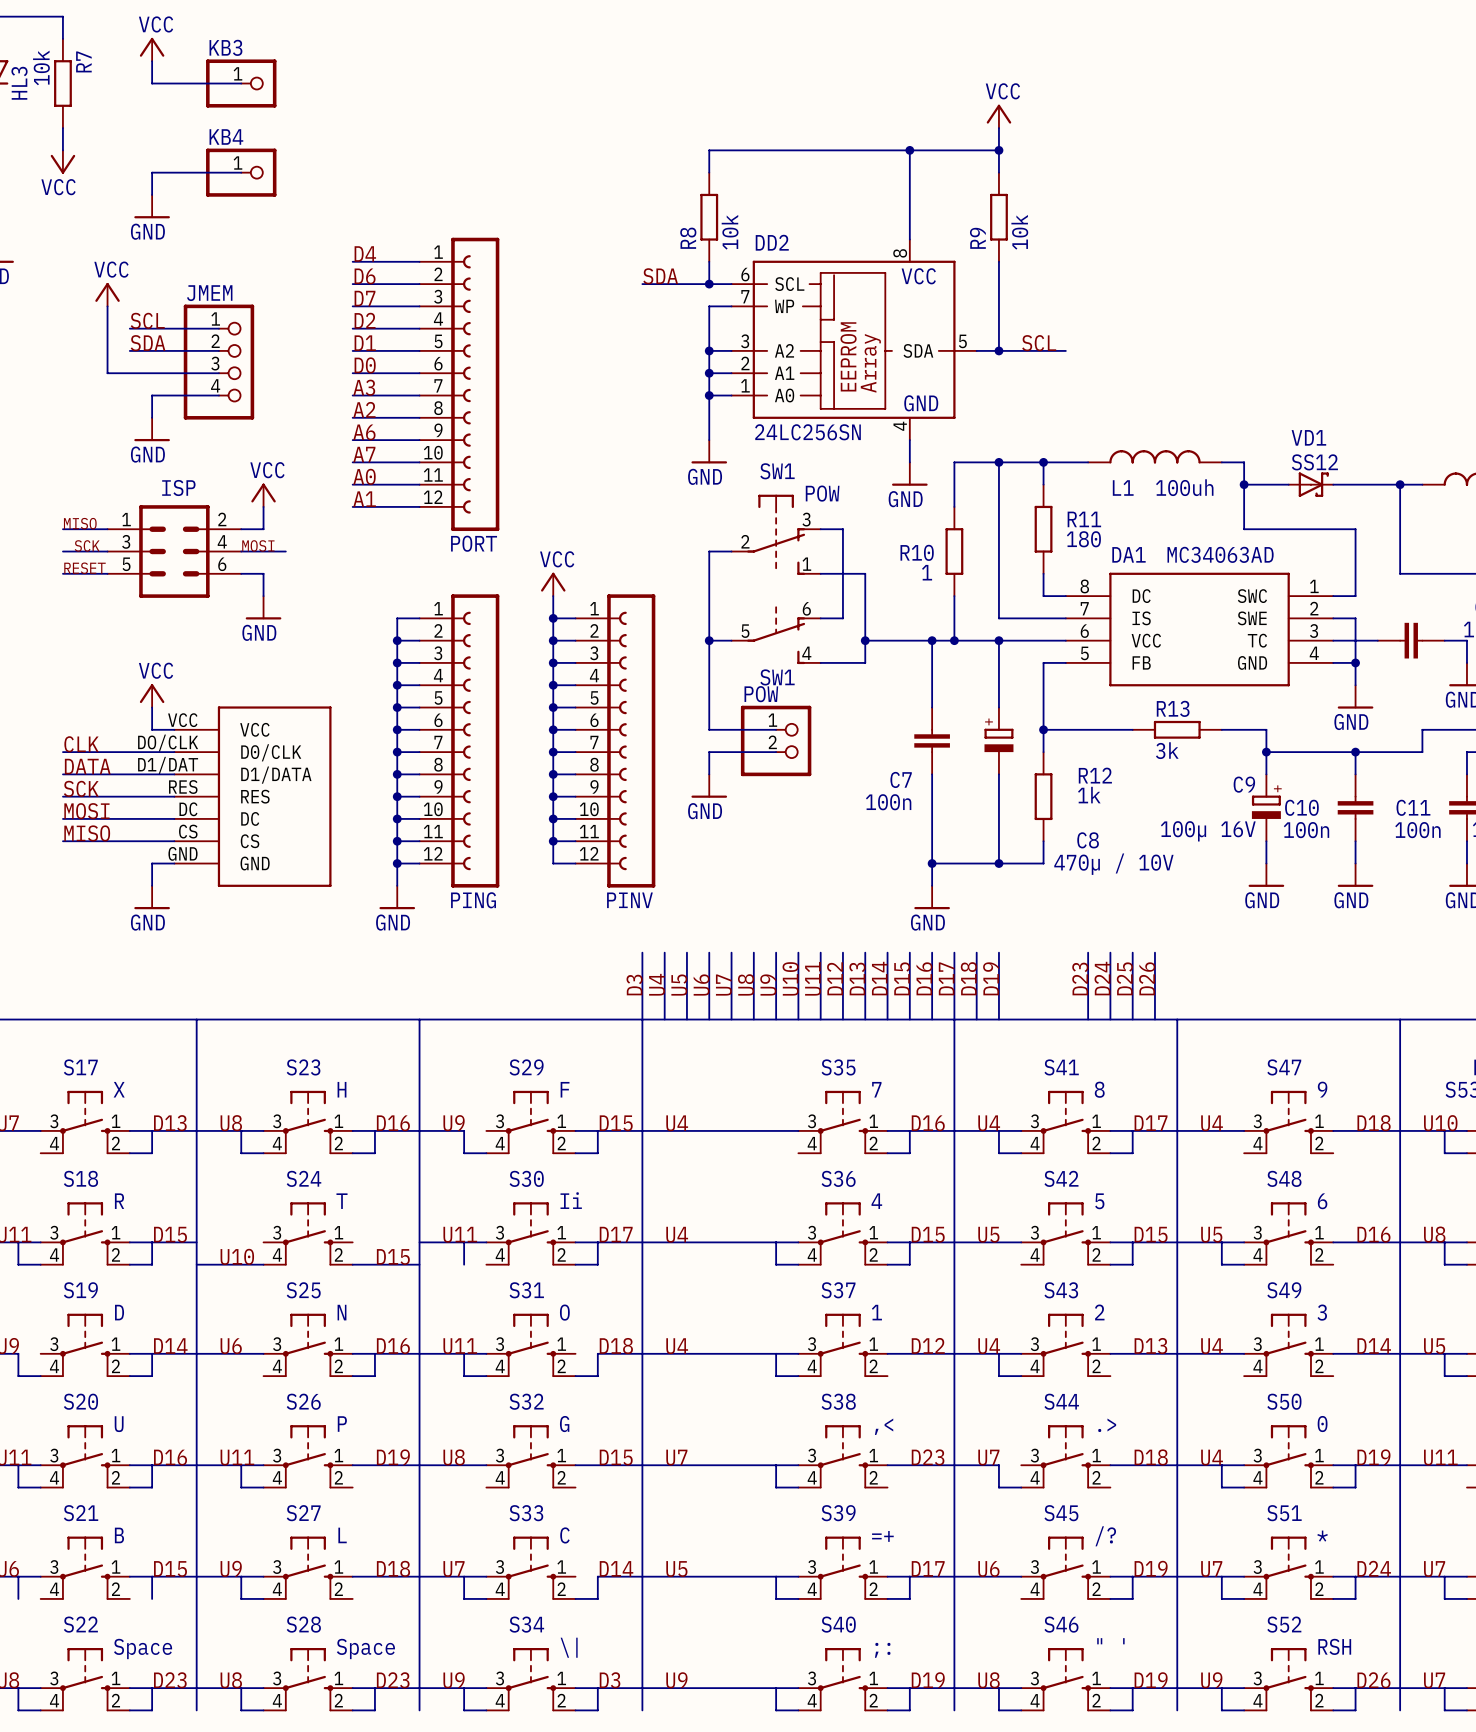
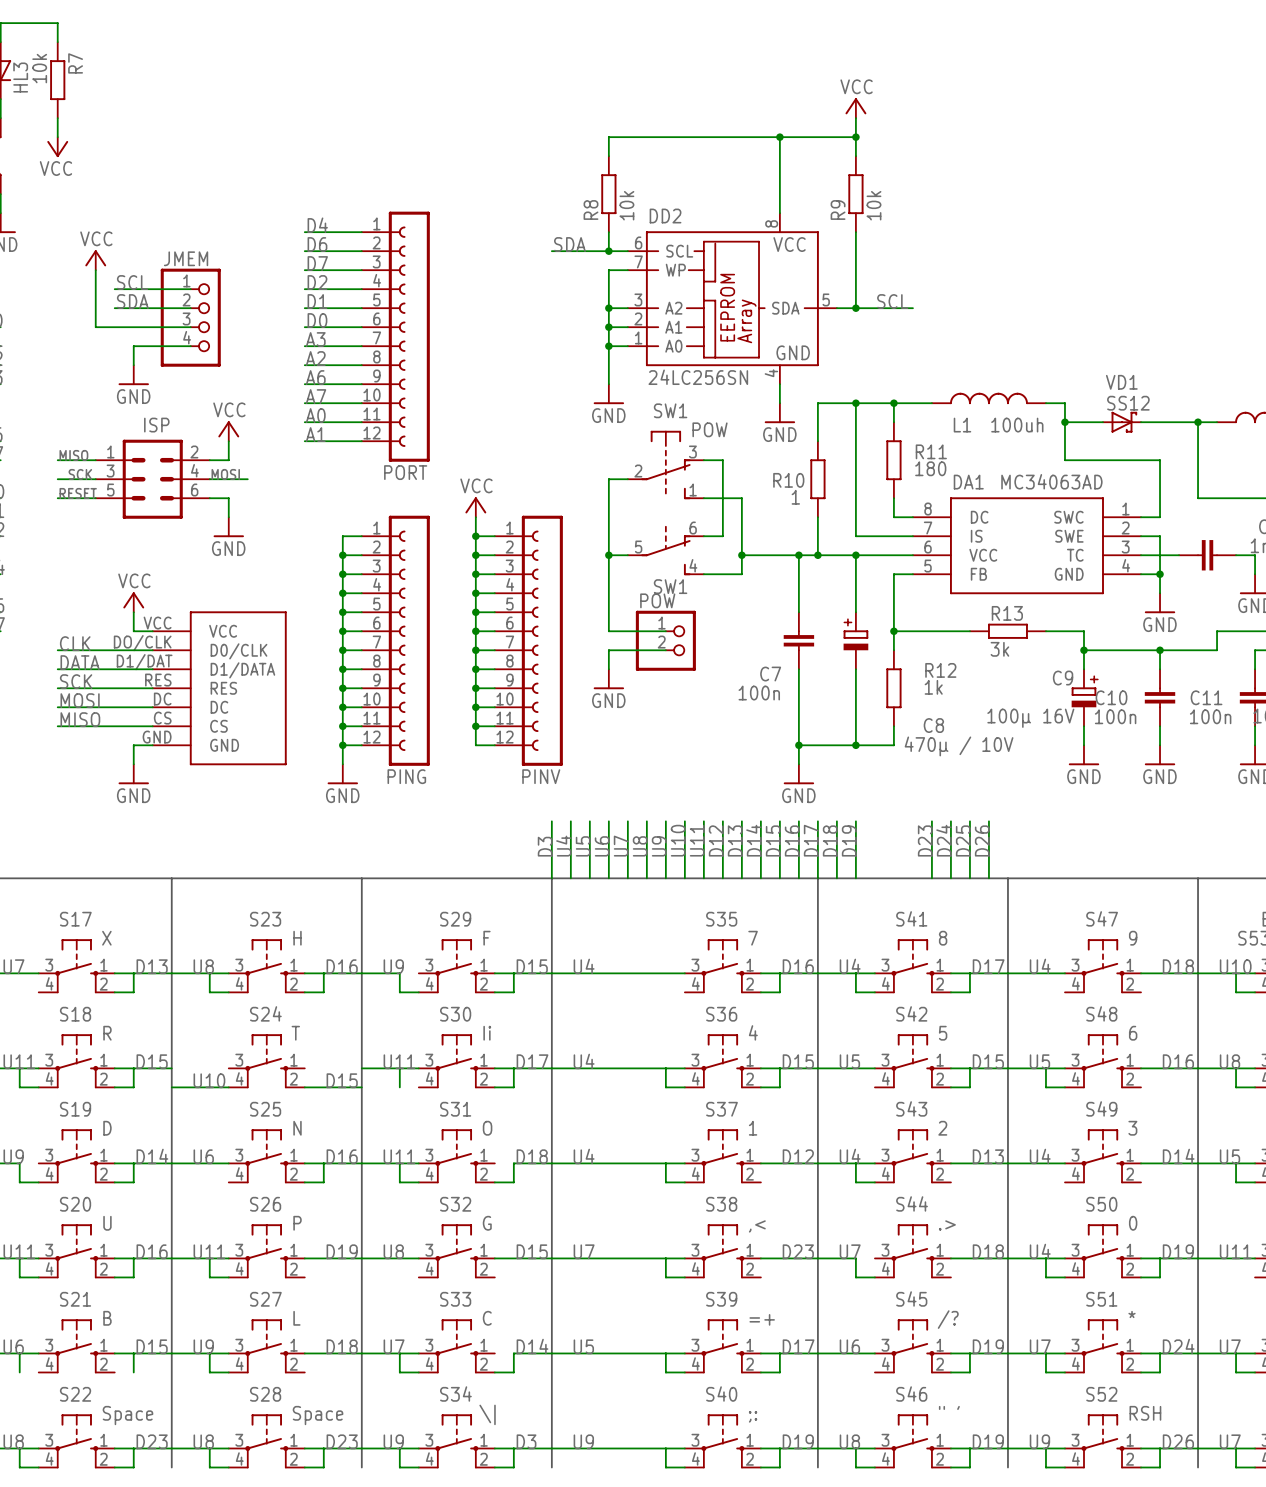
power symbol: VCC (152, 49) -> none
wire: (152, 61) (152, 83) (241, 83) -> none
KB3: (241, 83) -> none
wire: (241, 172) (152, 172) (152, 194) -> none
KB4: (241, 172) -> none
power symbol: GND (152, 206) -> none

